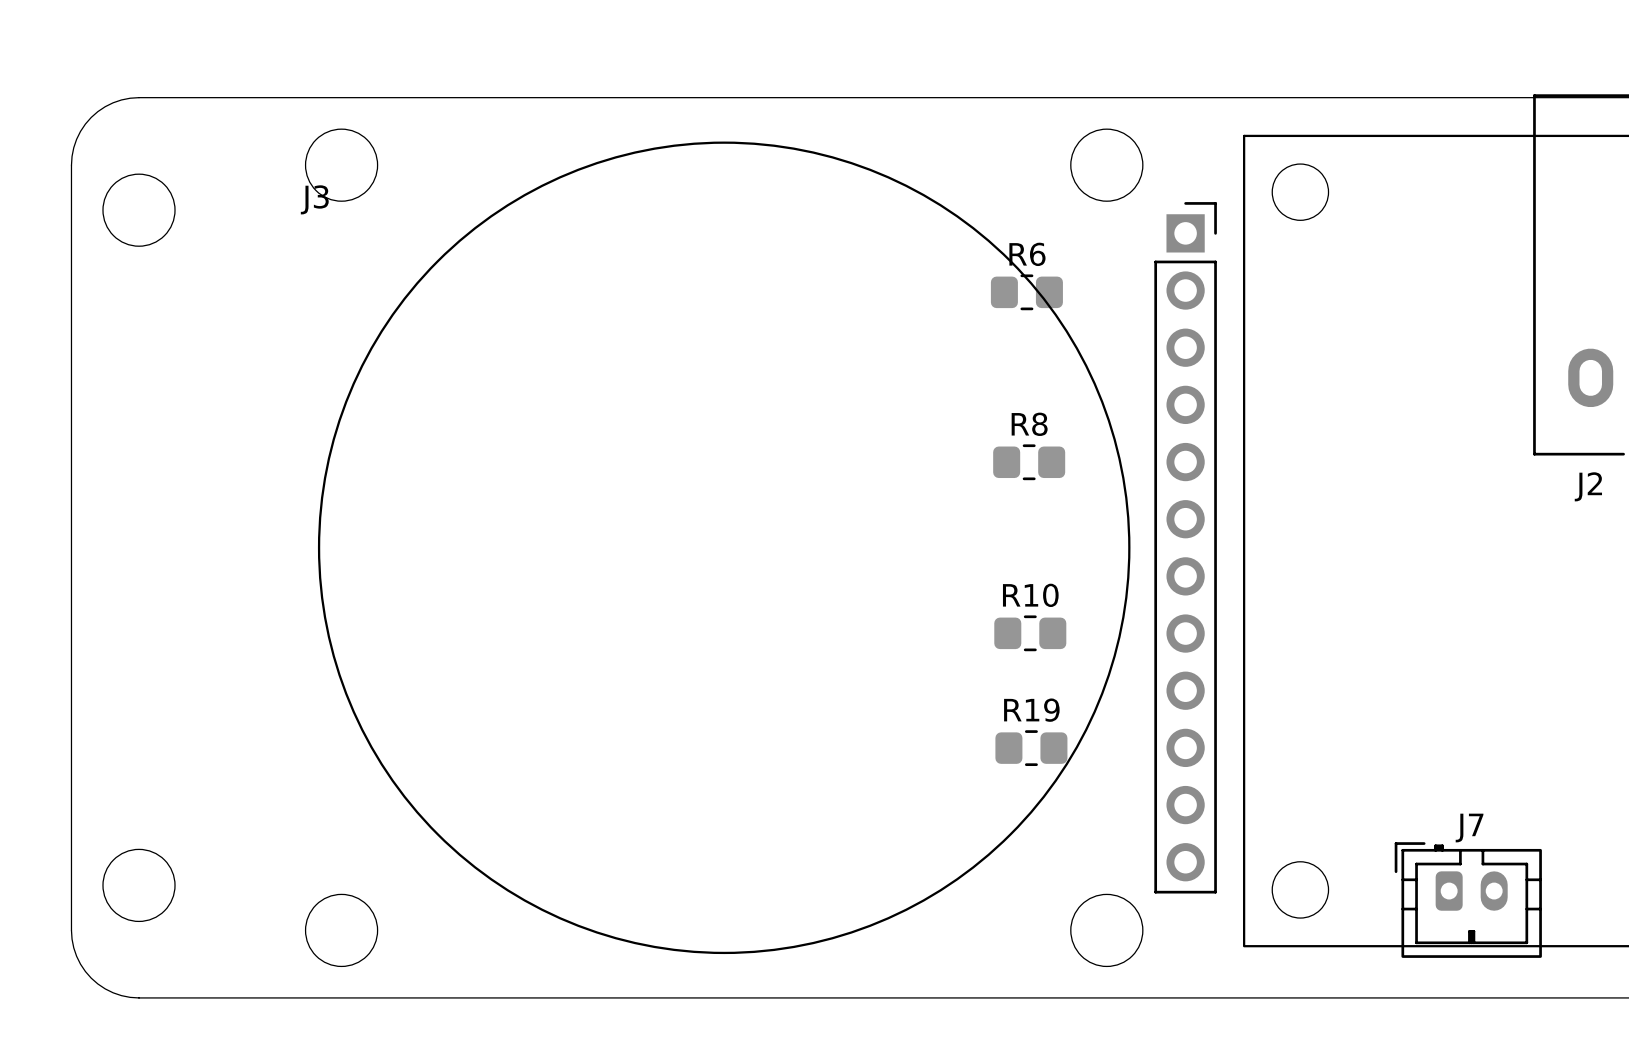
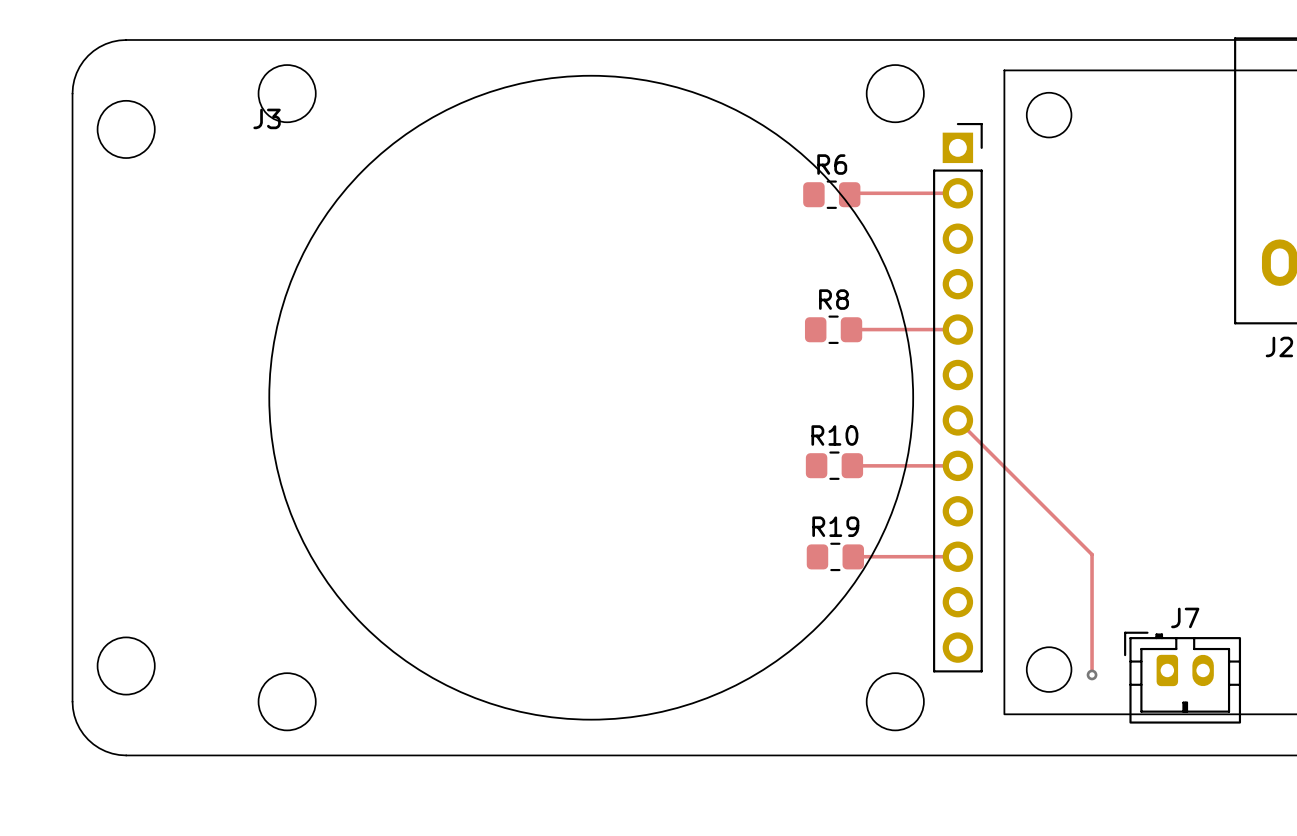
track: none -> (957, 193) (849, 194)
track: none -> (851, 329) (957, 329)
track: none -> (957, 420) (1092, 554) (1092, 674)
track: none -> (852, 465) (957, 465)
track: none -> (853, 556) (957, 556)
via: none -> (1092, 674)

